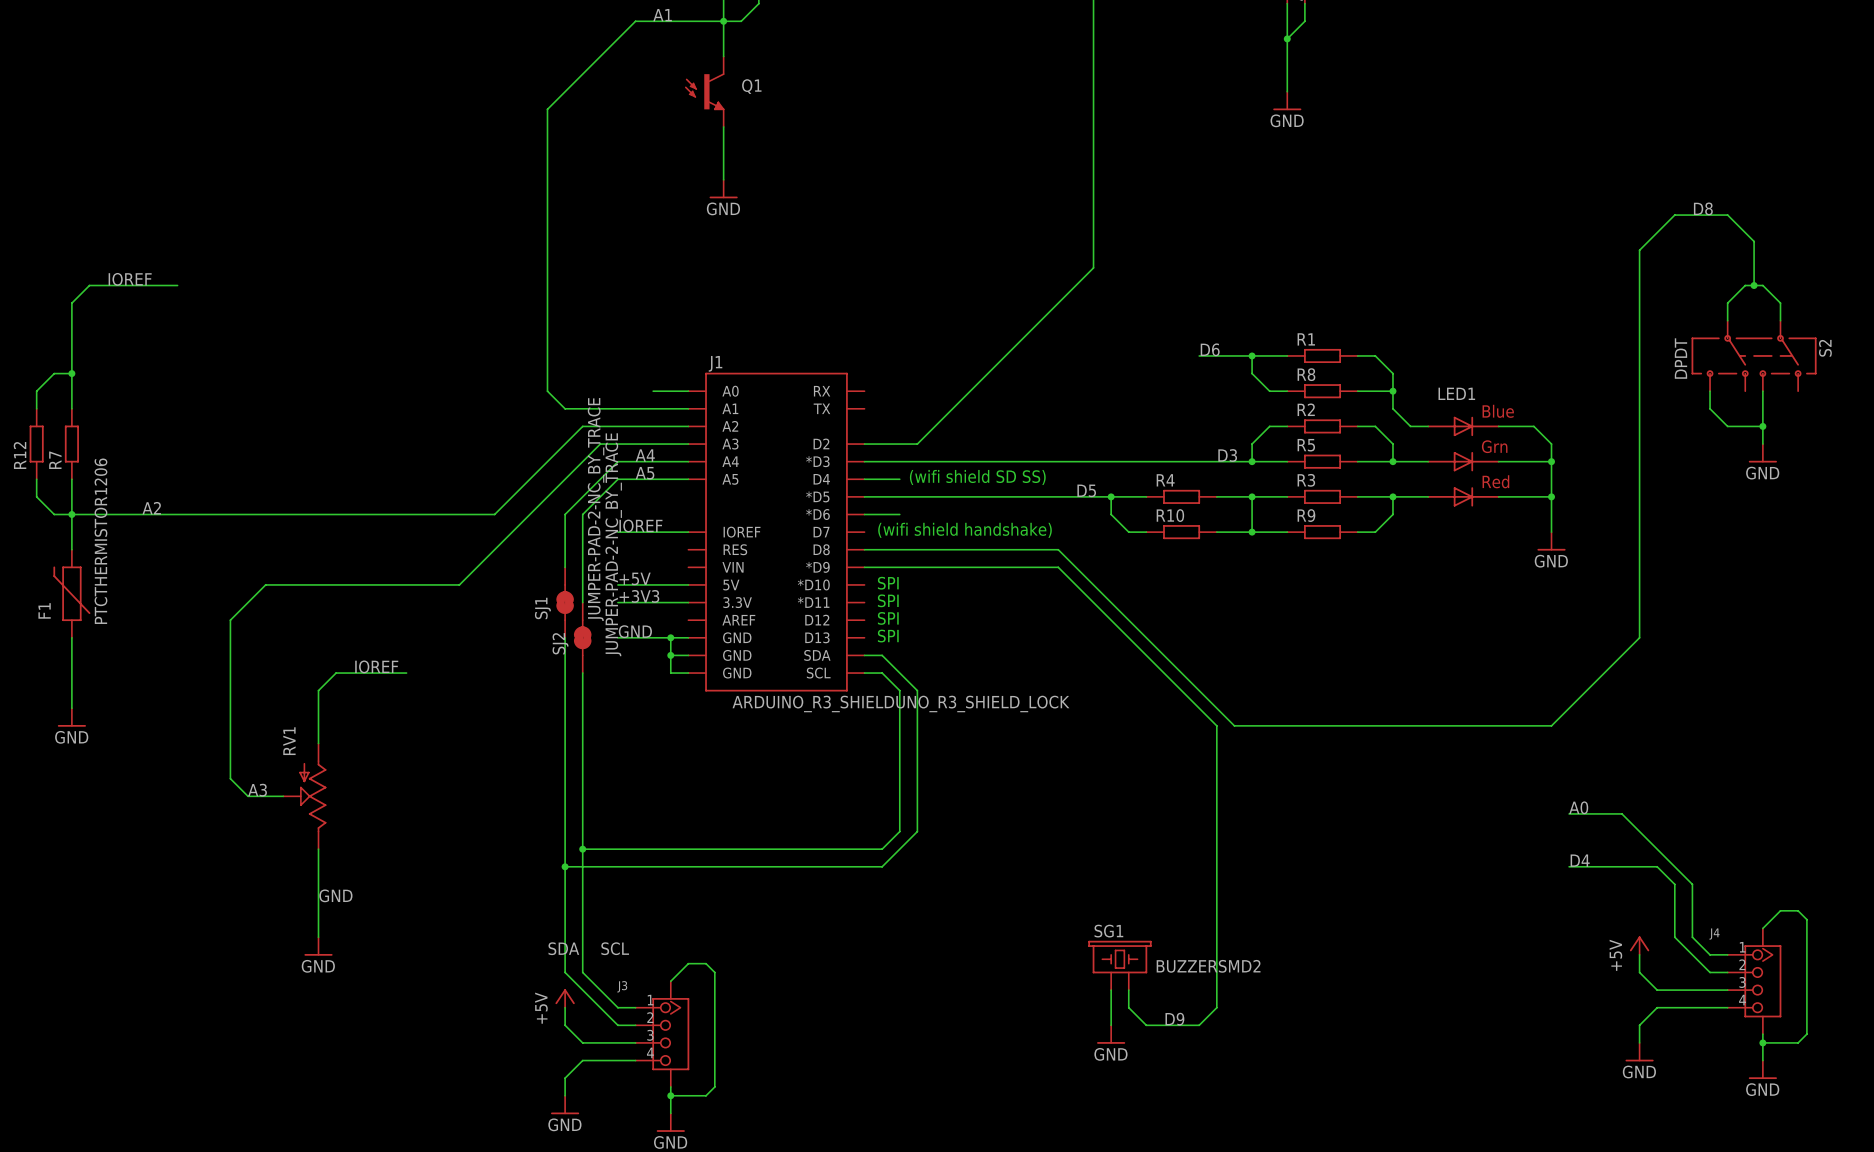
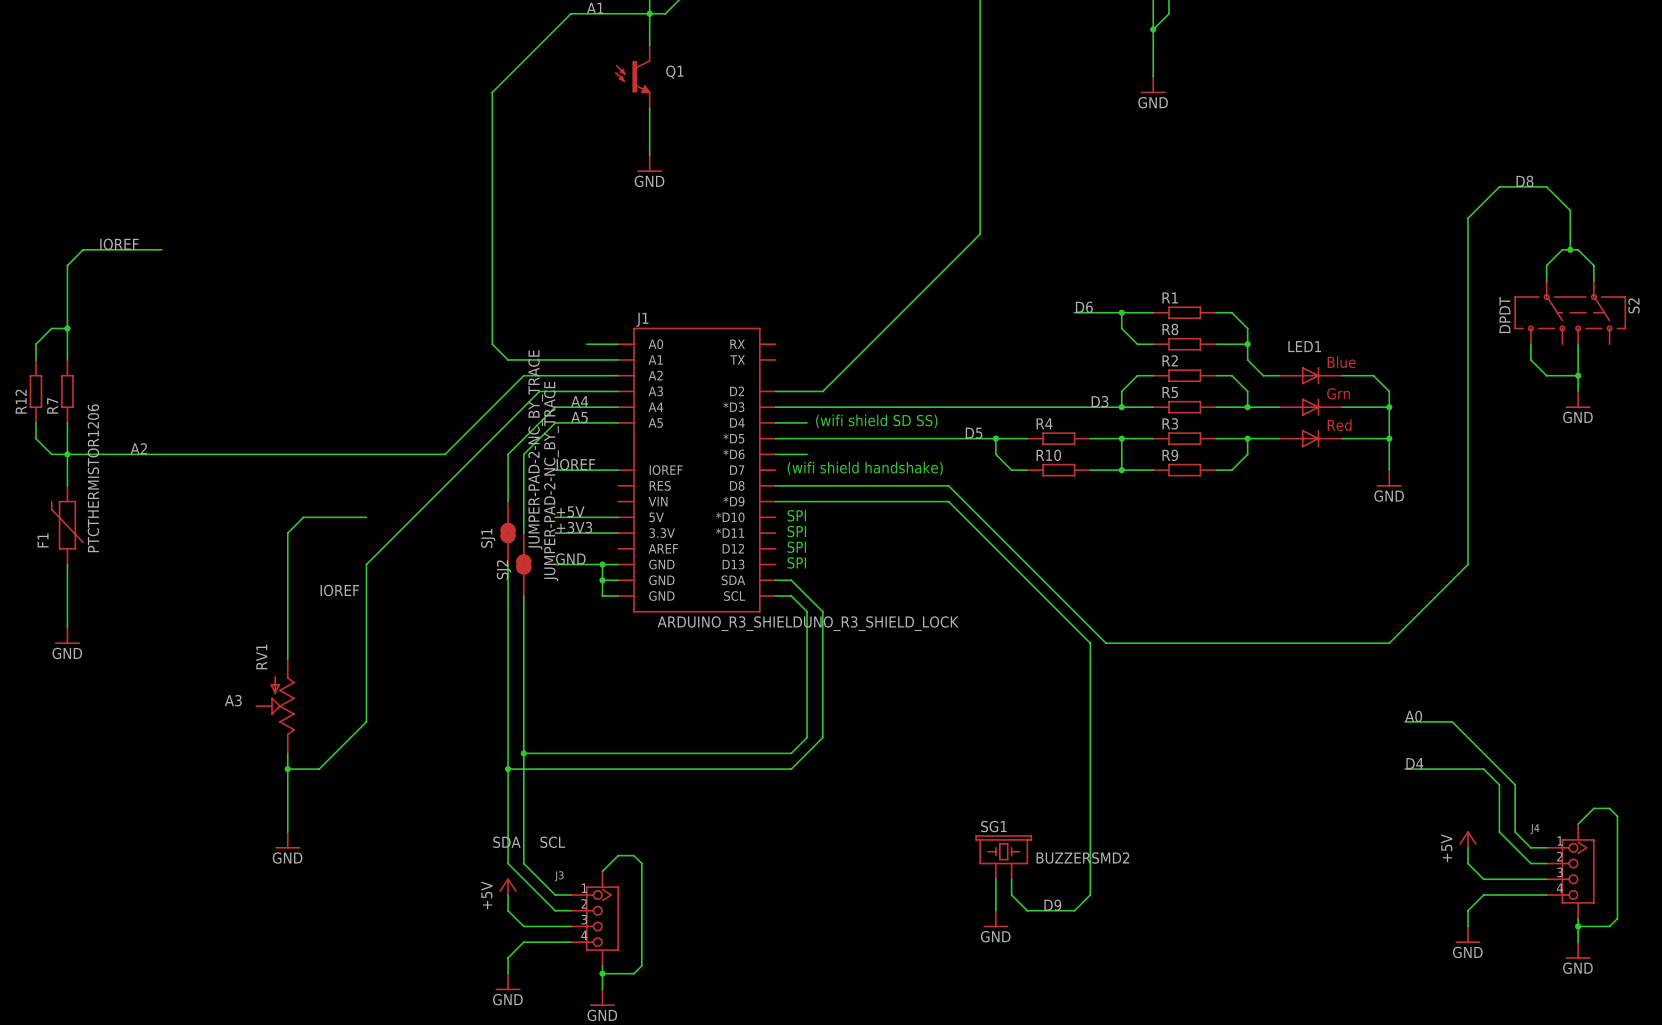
wire: (336, 584) (265, 584) (230, 620) (230, 778) (248, 796) (283, 796) -> (303, 517) (287, 533) (287, 611)
wire: (406, 584) (459, 584) -> (287, 769) (319, 769) (366, 721) (366, 564) (413, 517)
wire: (406, 673) (336, 673) (318, 690) -> none
junction: none -> (287, 769)
label: GND (335, 895) -> none

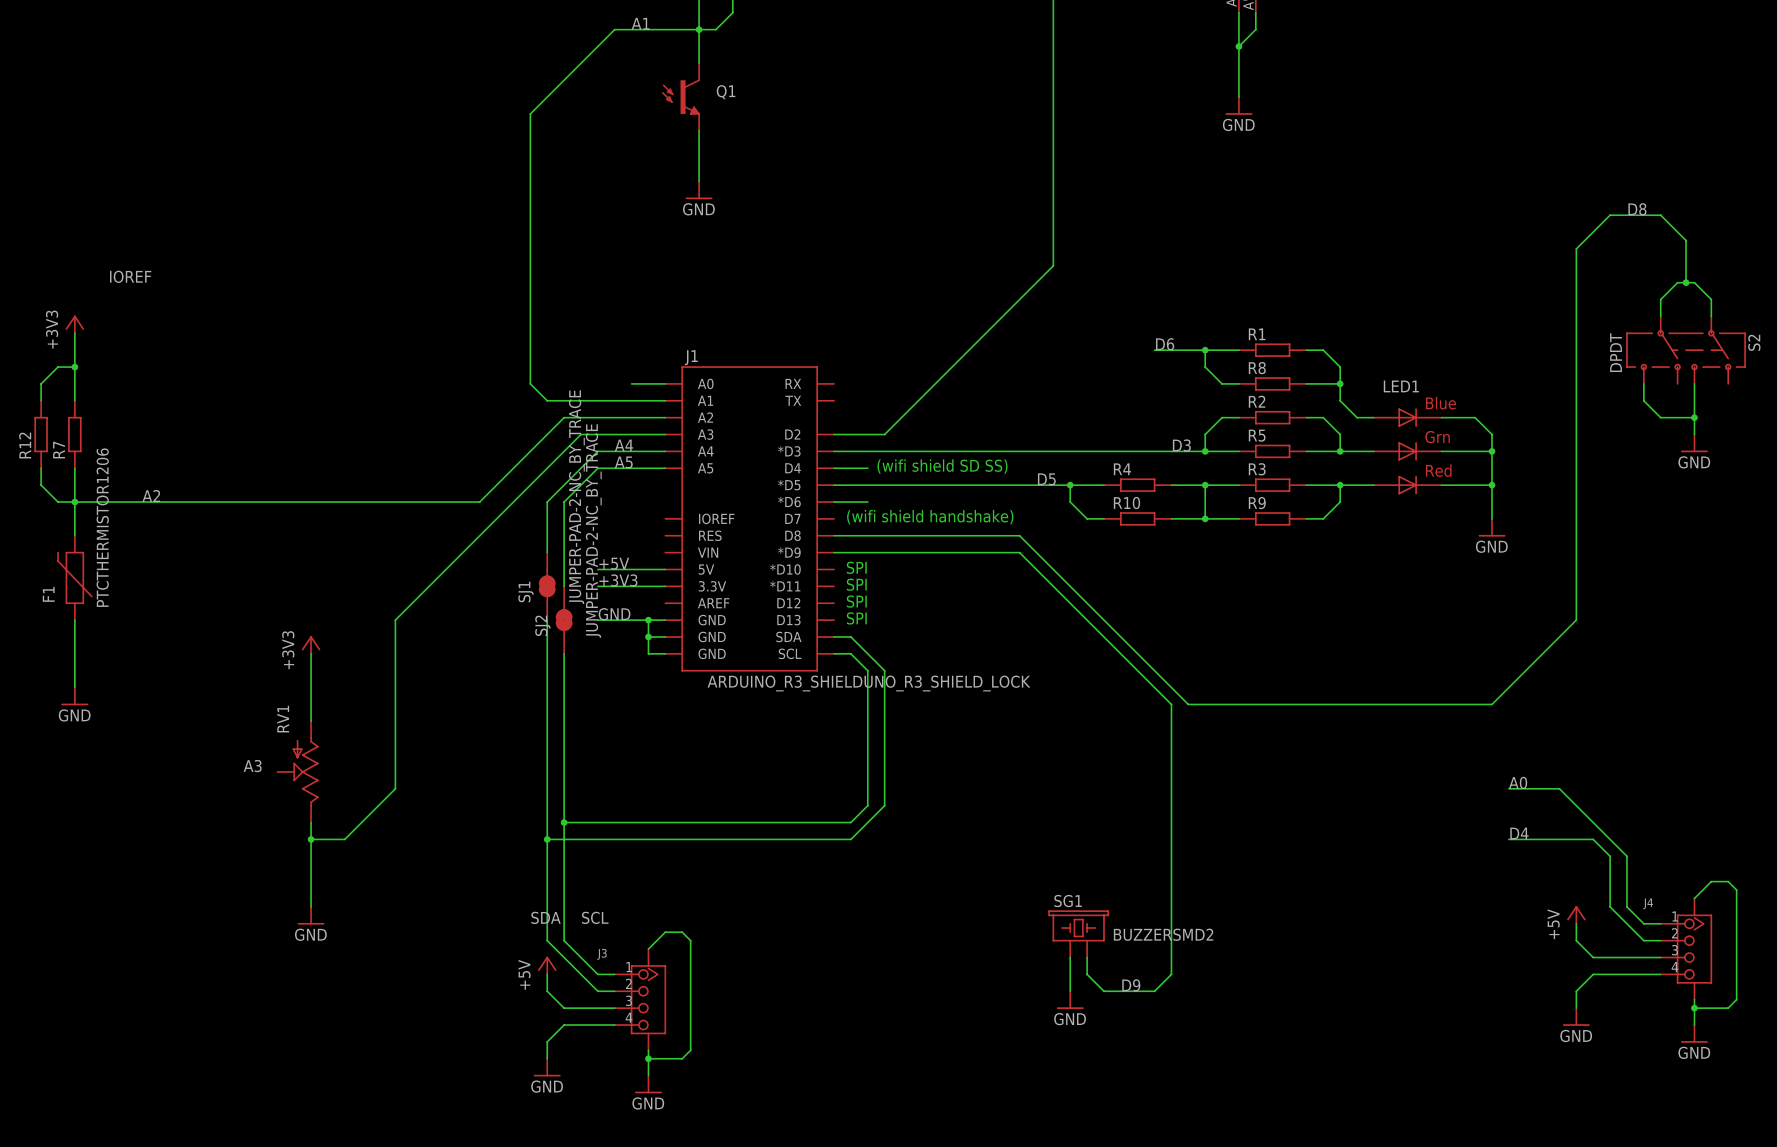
wire: (161, 249) (83, 249) (67, 265) (67, 297) -> none
power symbol: none -> +3V3 (74, 324)
label: IOREF (575, 464) -> none
wire: (555, 470) (618, 470) -> none
wire: (366, 517) (303, 517) (287, 533) (287, 596) -> none
power symbol: none -> +3V3 (311, 645)
label: IOREF (339, 590) -> none

